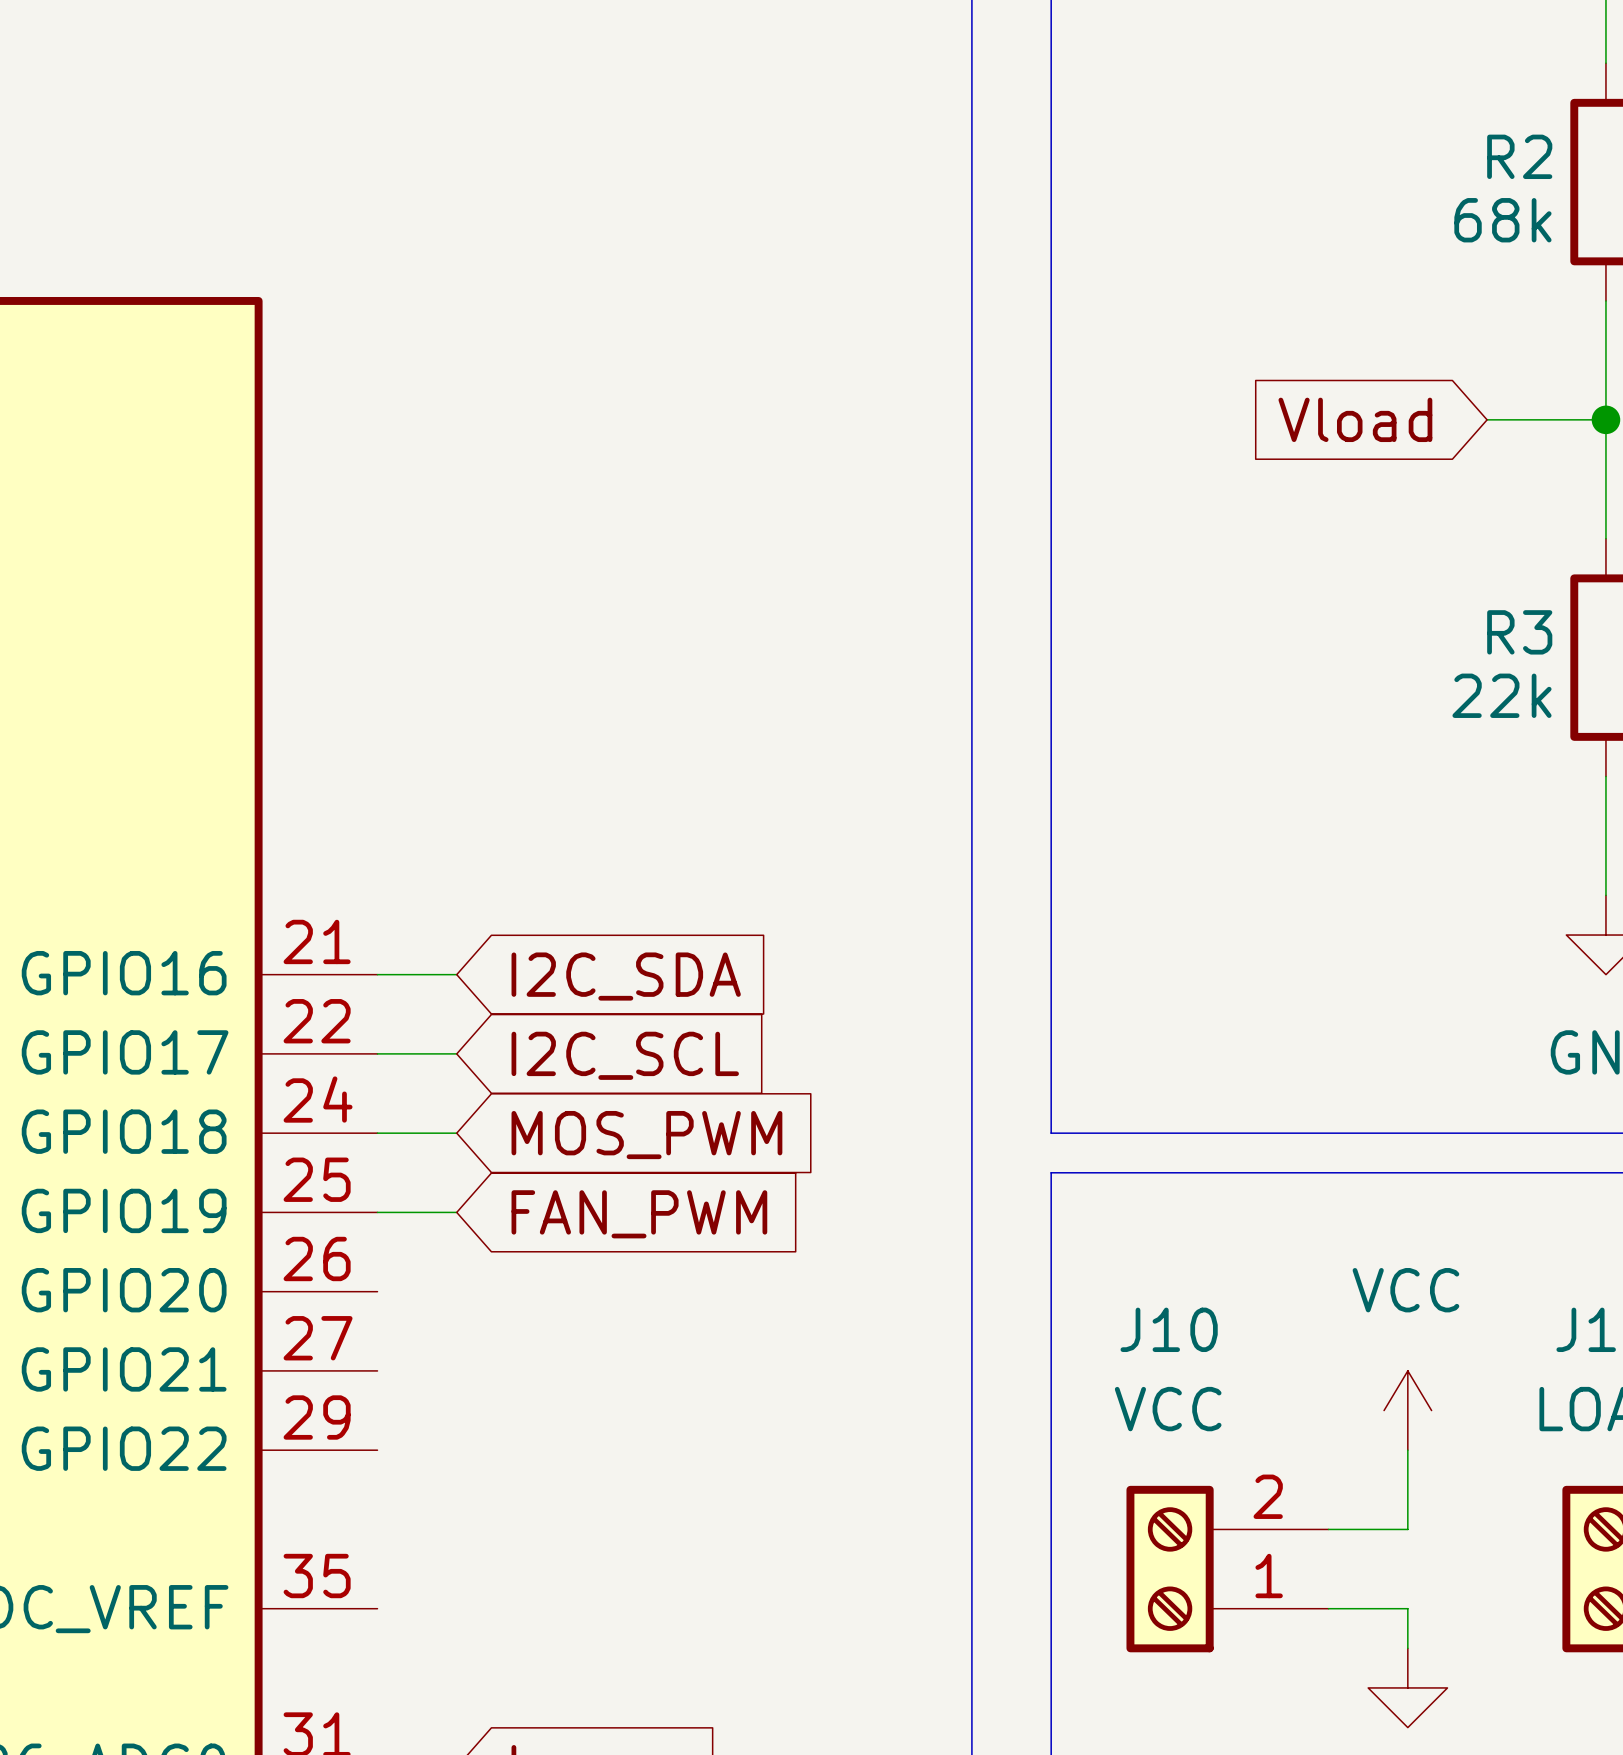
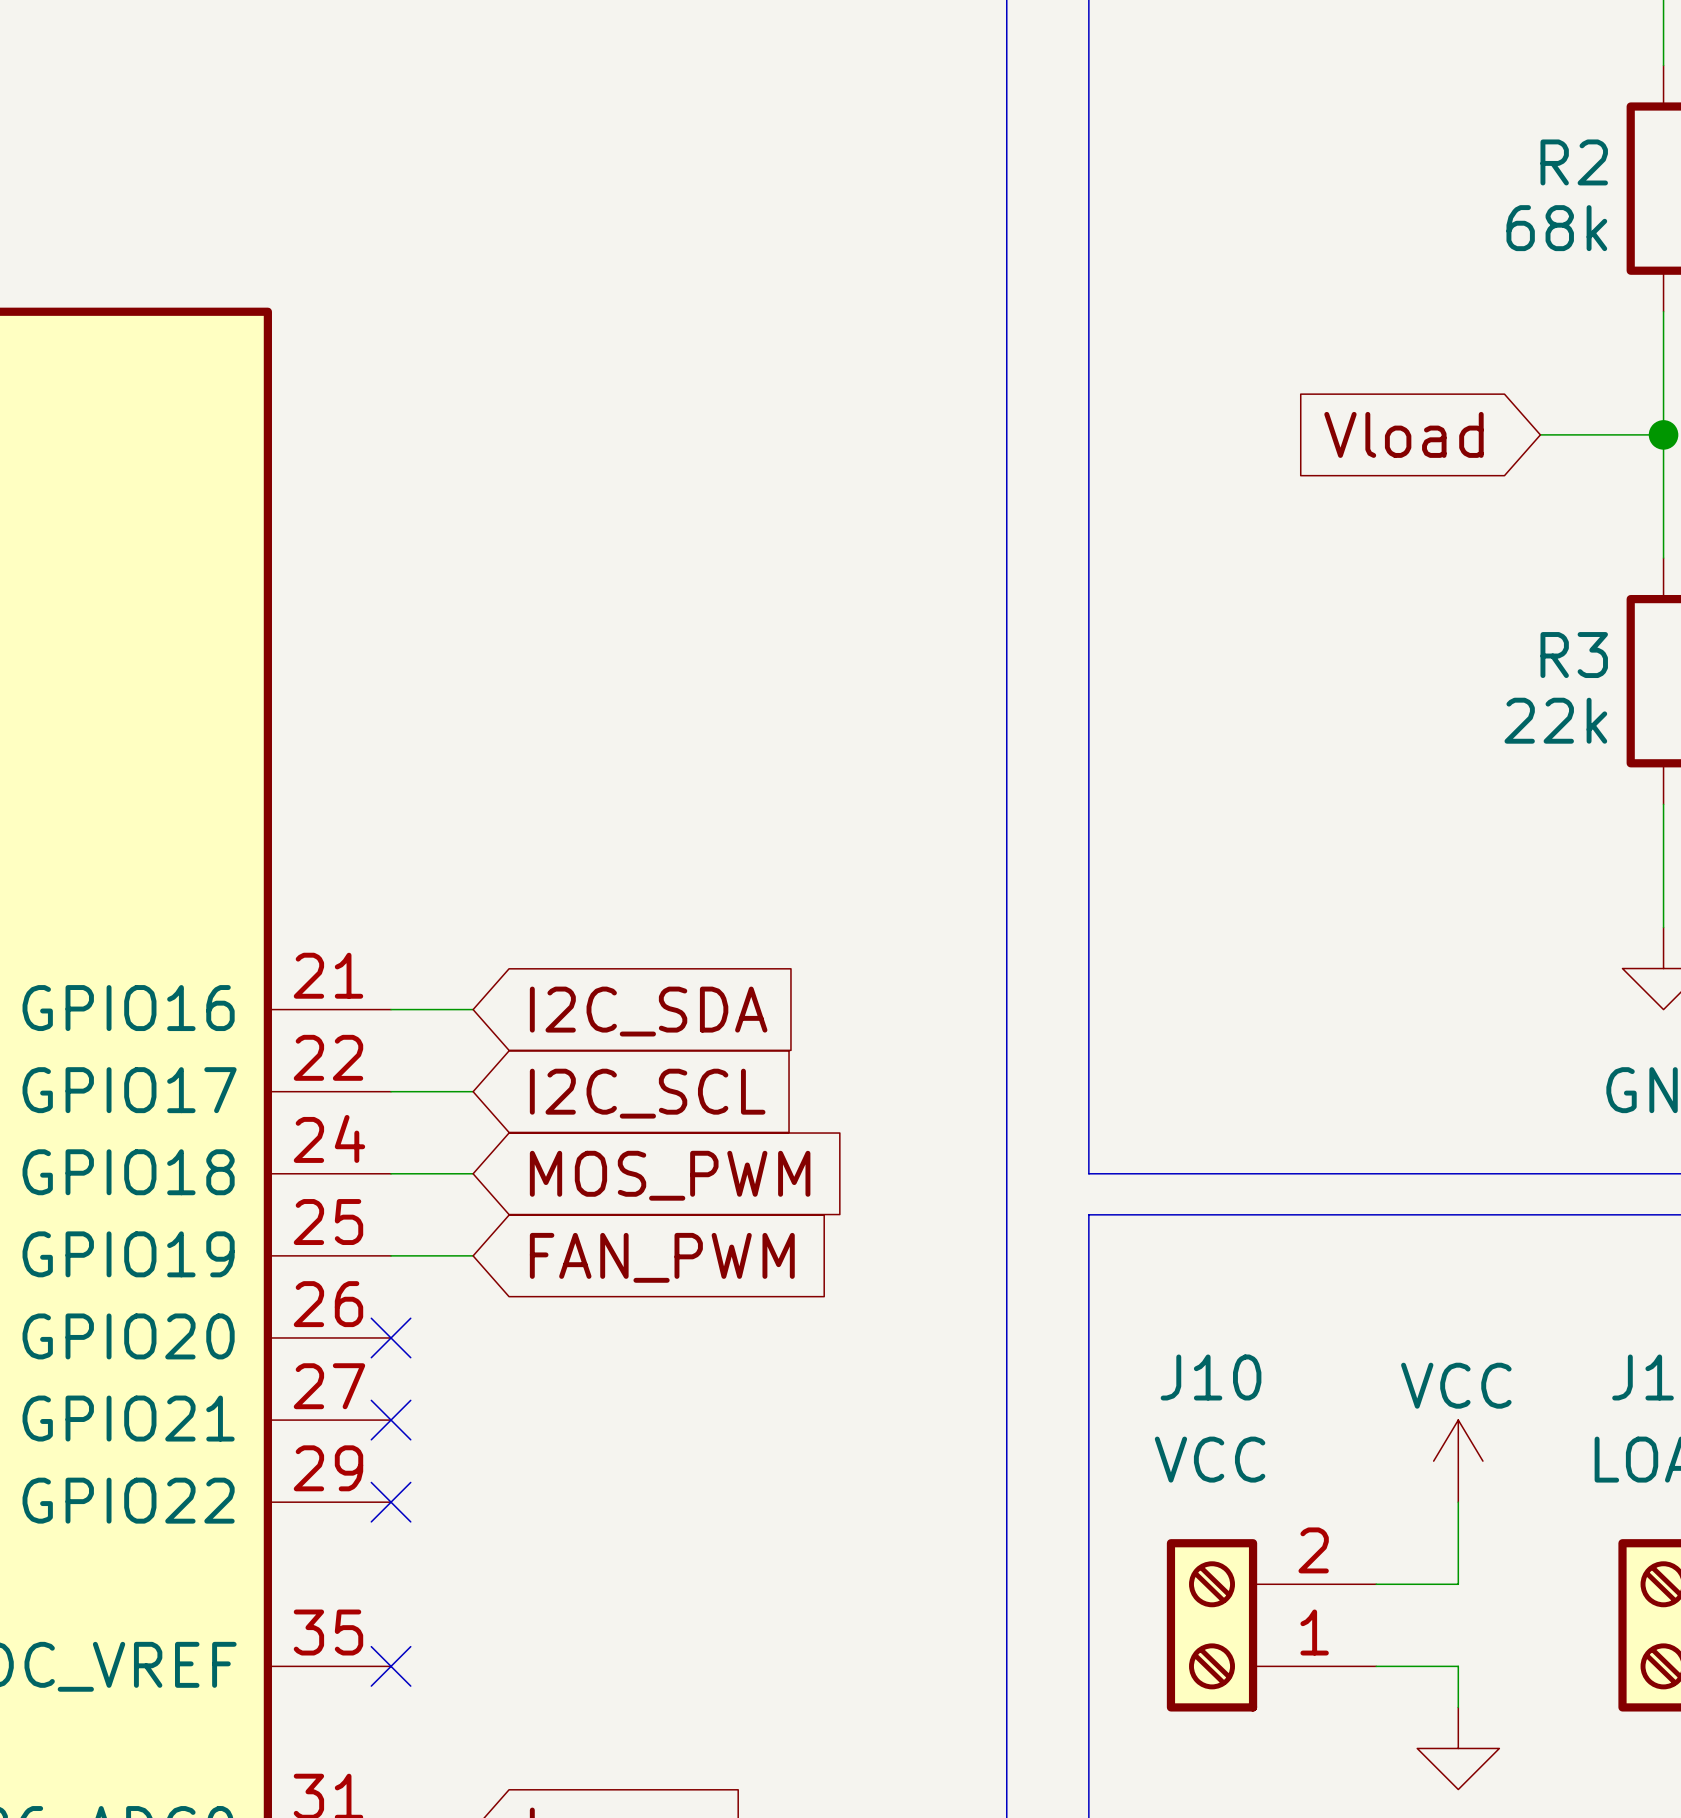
power symbol text position: VCC (1405, 1290) -> VCC (1456, 1385)
no-connect mark: none -> (391, 1337)
no-connect mark: none -> (391, 1420)
no-connect mark: none -> (391, 1502)
no-connect mark: none -> (391, 1666)

